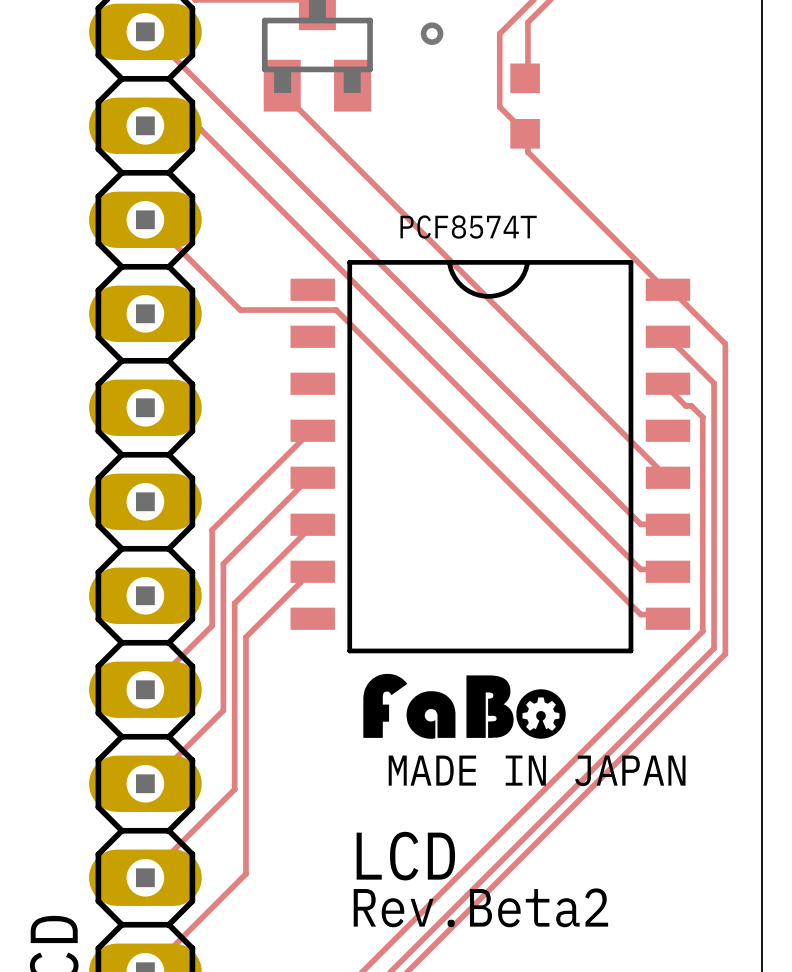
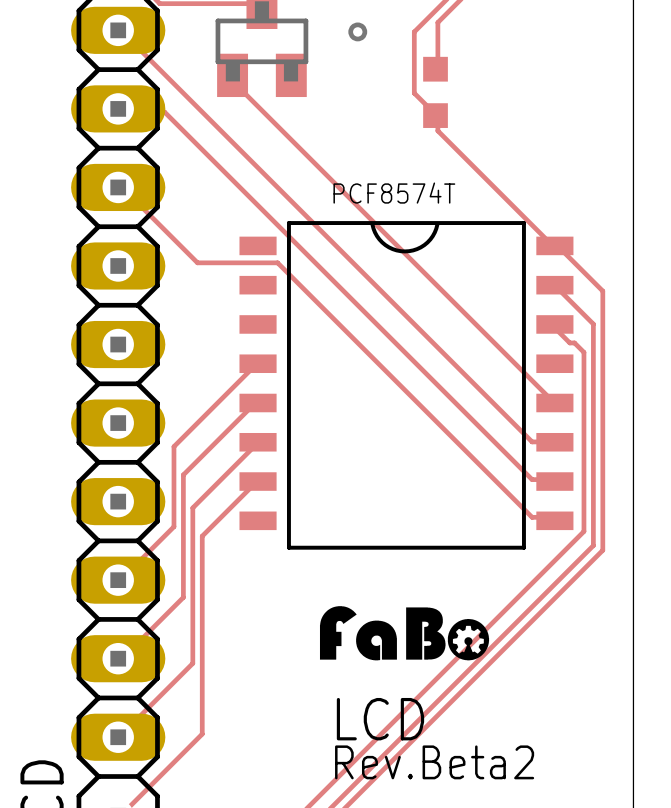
drawing position: (464, 706) -> (404, 633)
text: MADE IN JAPAN (537, 770) -> none
text position: LCD (405, 856) -> LCD (380, 719)
text position: Rev.Beta2 (480, 907) -> Rev.Beta2 (434, 762)

